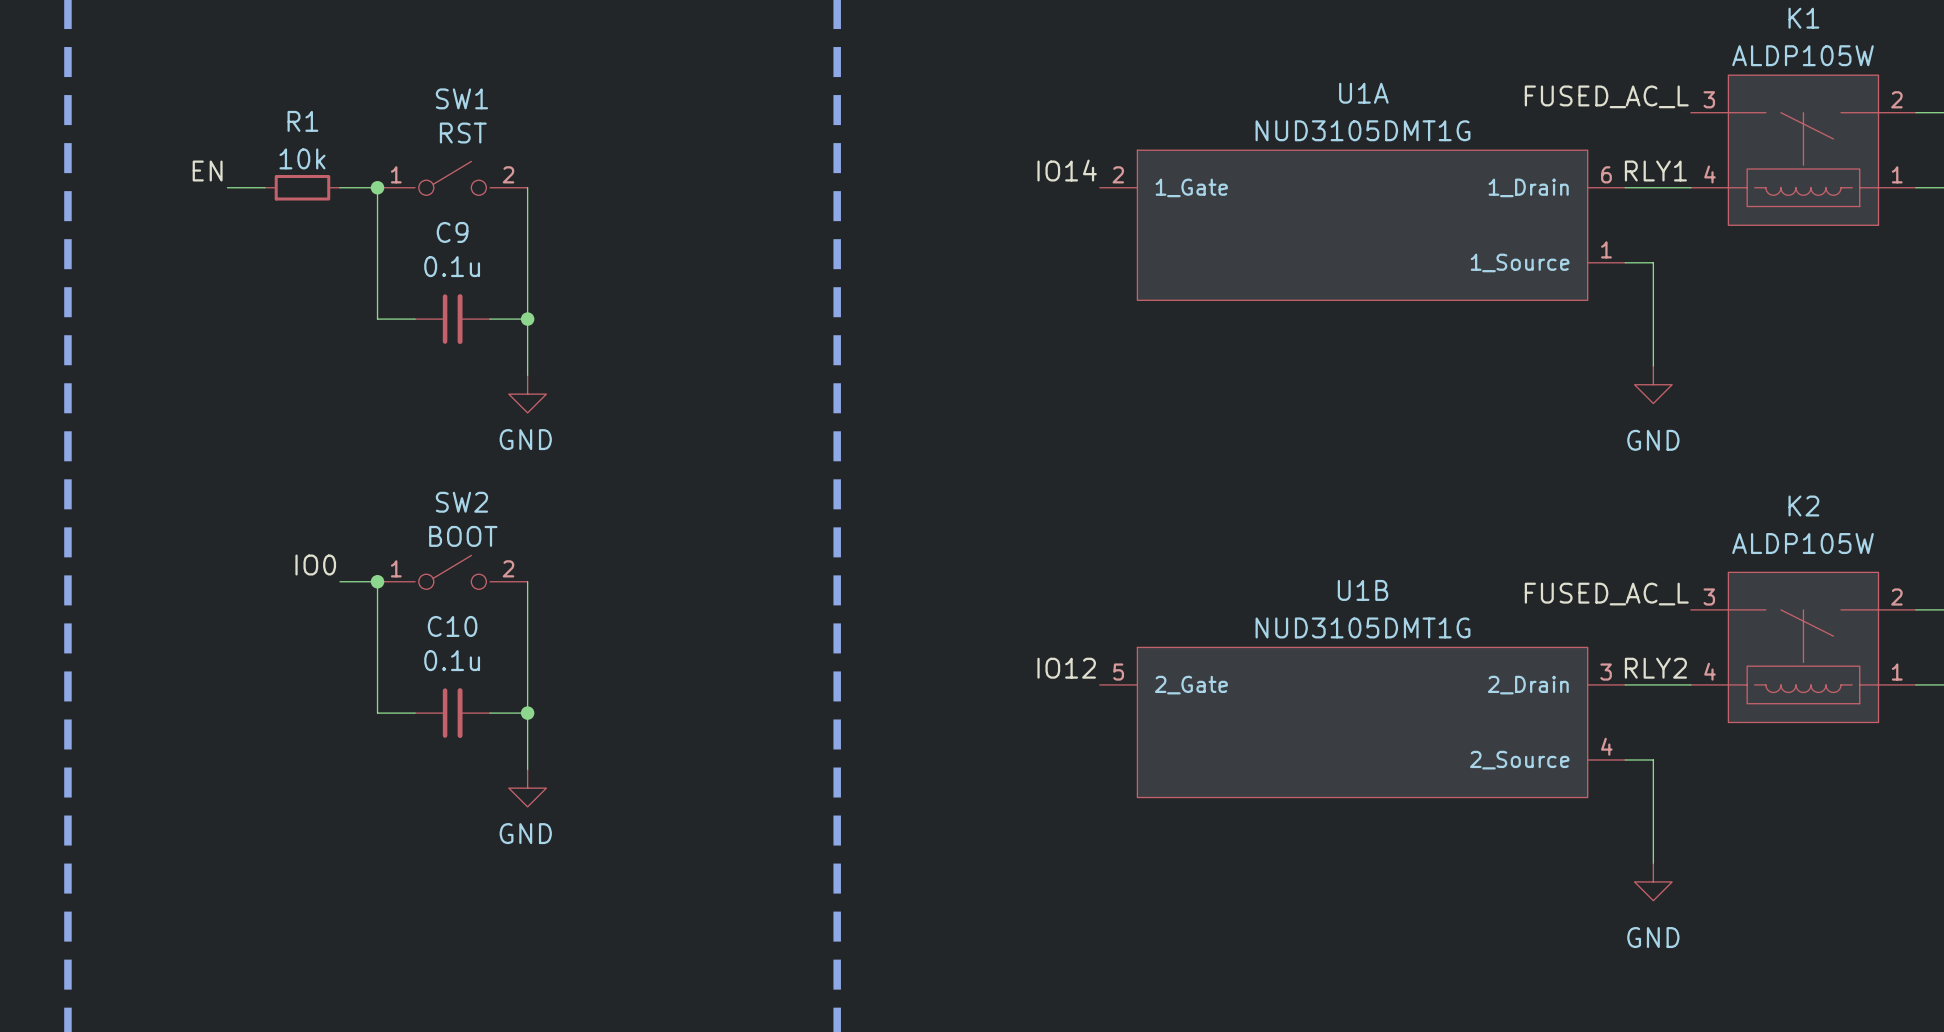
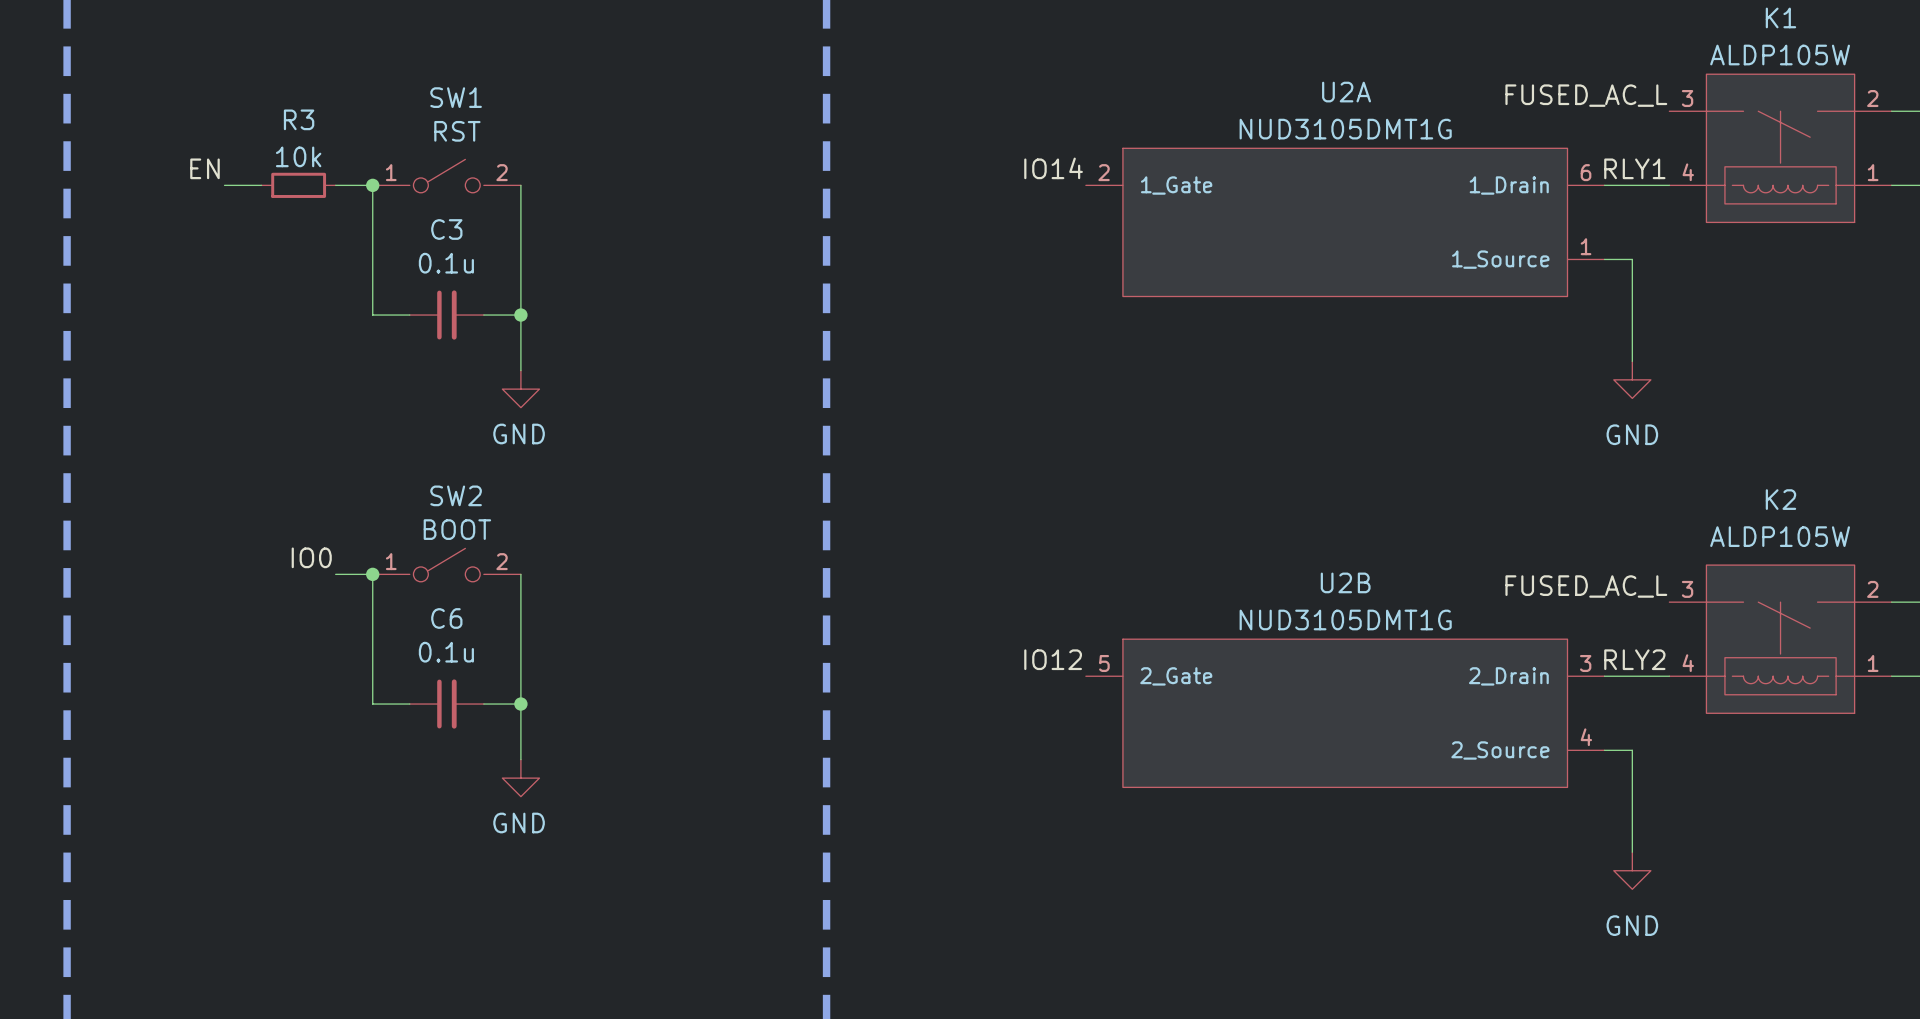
U1A name: U1A (1363, 93) -> U2A (1346, 92)
R1 name: R1 (302, 121) -> R3 (299, 119)
C9 name: C9 (452, 232) -> C3 (446, 229)
U1B name: U1B (1362, 590) -> U2B (1345, 582)
C10 name: C10 (452, 626) -> C6 (446, 618)

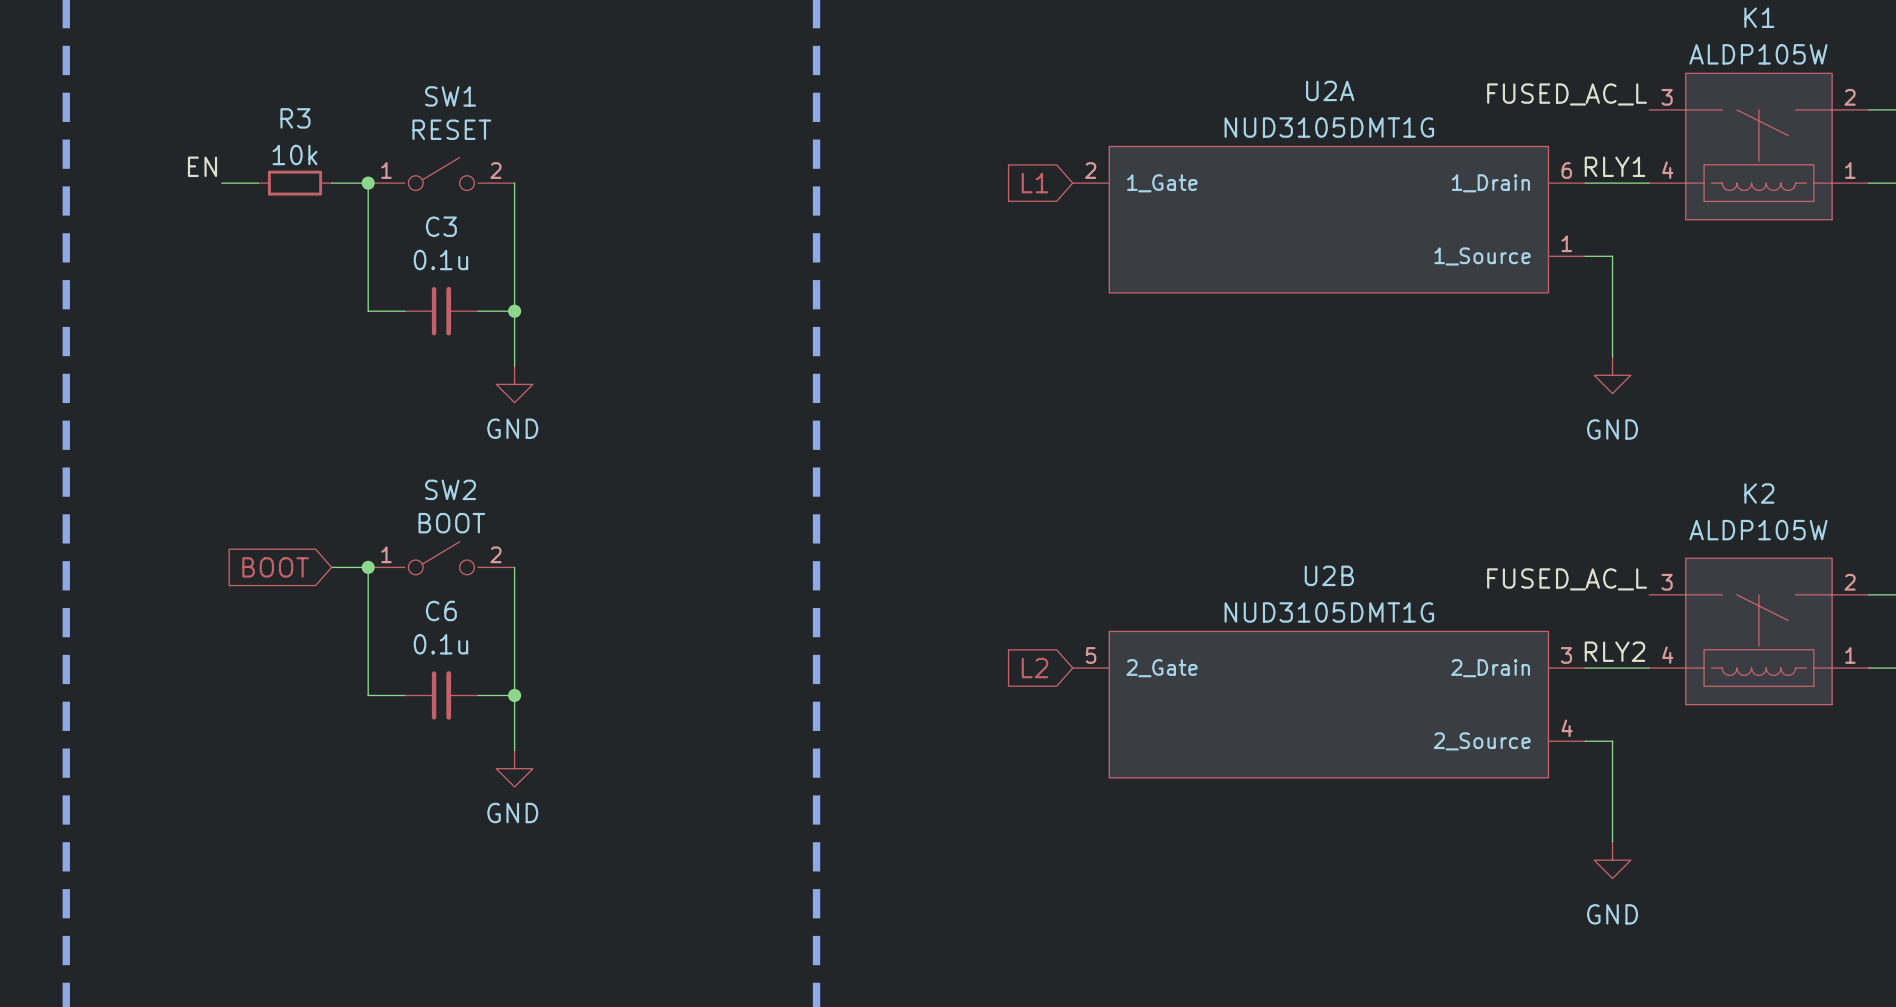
SW1 value: RST (457, 131) -> RESET (451, 129)
label: IO14 (1053, 168) -> none
global label: none -> L1 (1034, 183)
label: IO0 (311, 557) -> none
global label: none -> BOOT (275, 567)
label: IO12 (1053, 659) -> none
global label: none -> L2 (1034, 668)

